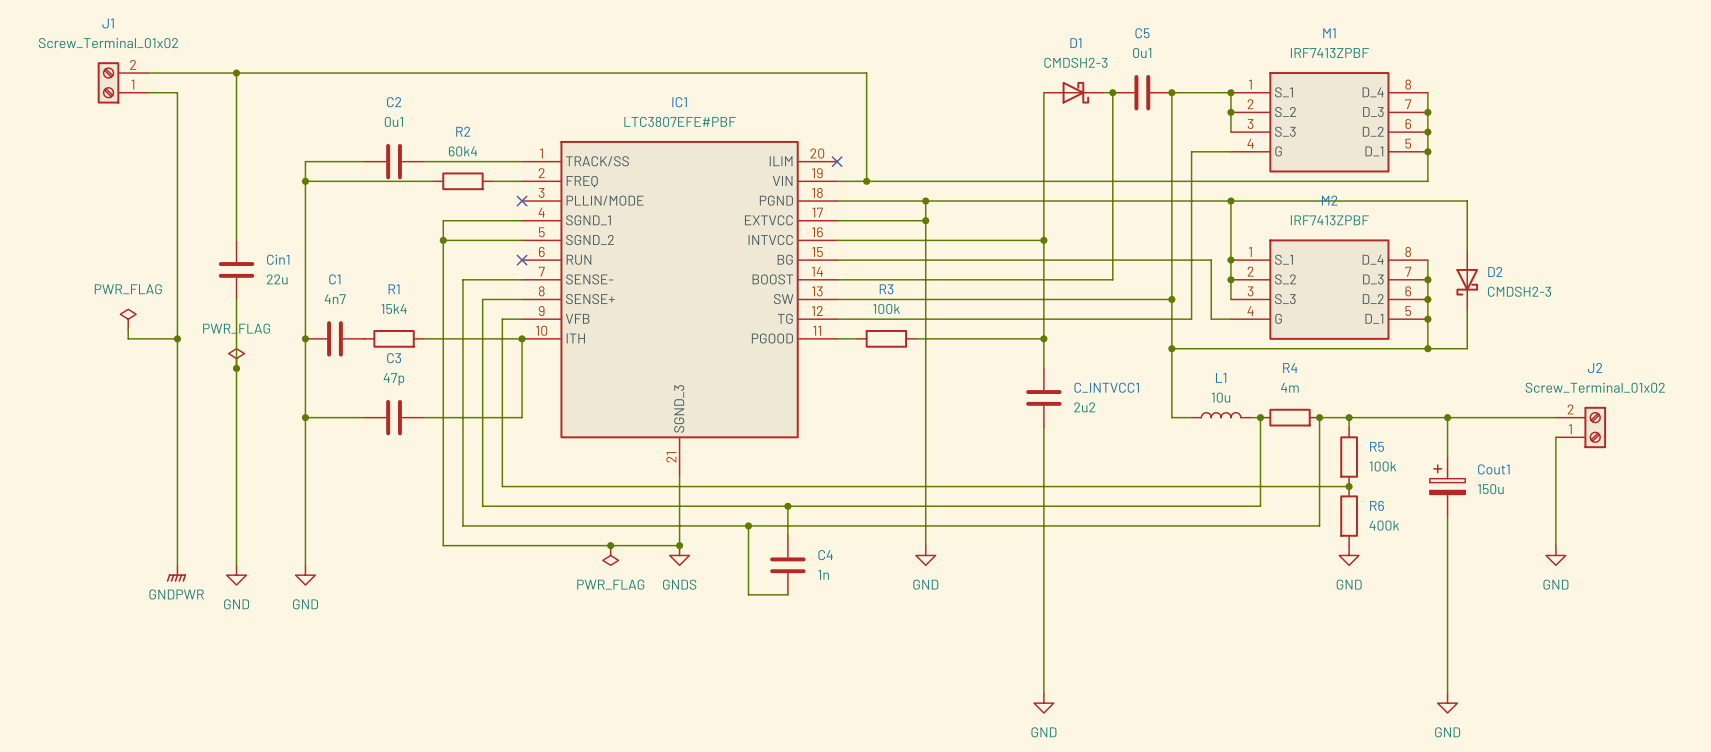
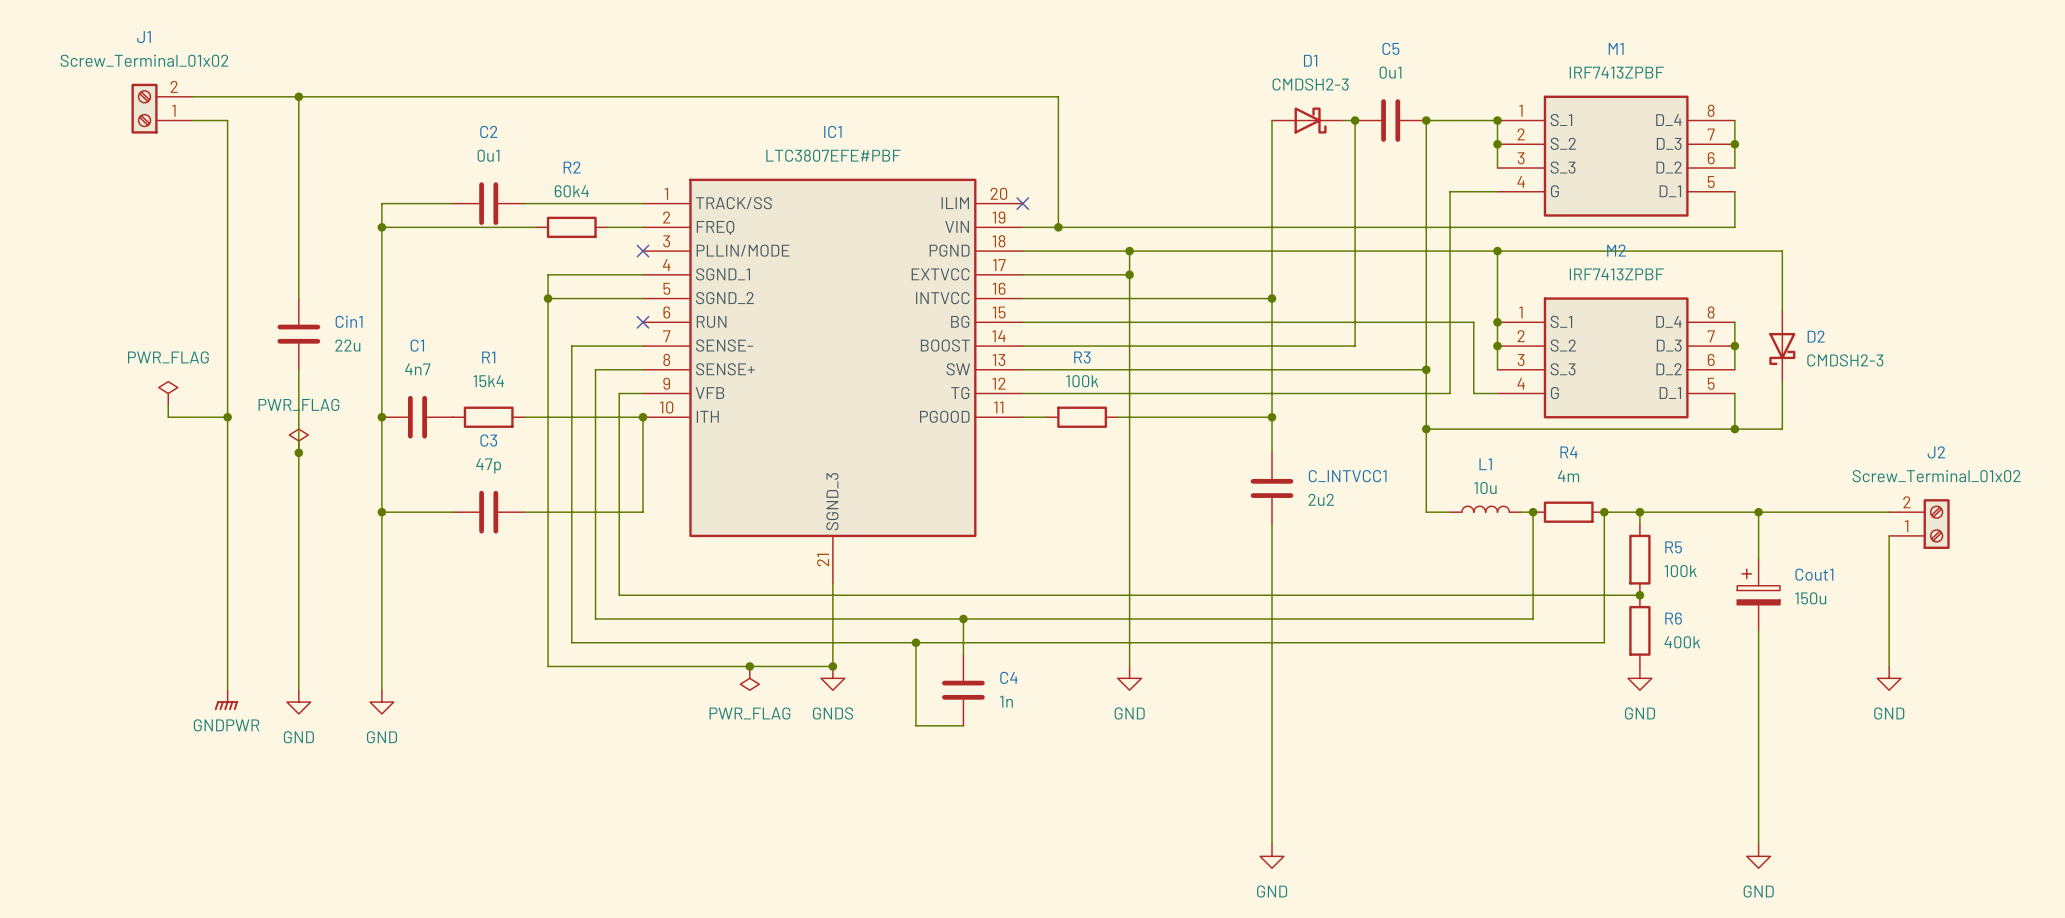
wire: (1427, 132) (1427, 151) -> none
junction: (1427, 132) -> none
junction: (1427, 151) -> none
wire: (1427, 299) (1427, 319) -> none
junction: (1427, 299) -> none
junction: (1427, 319) -> none

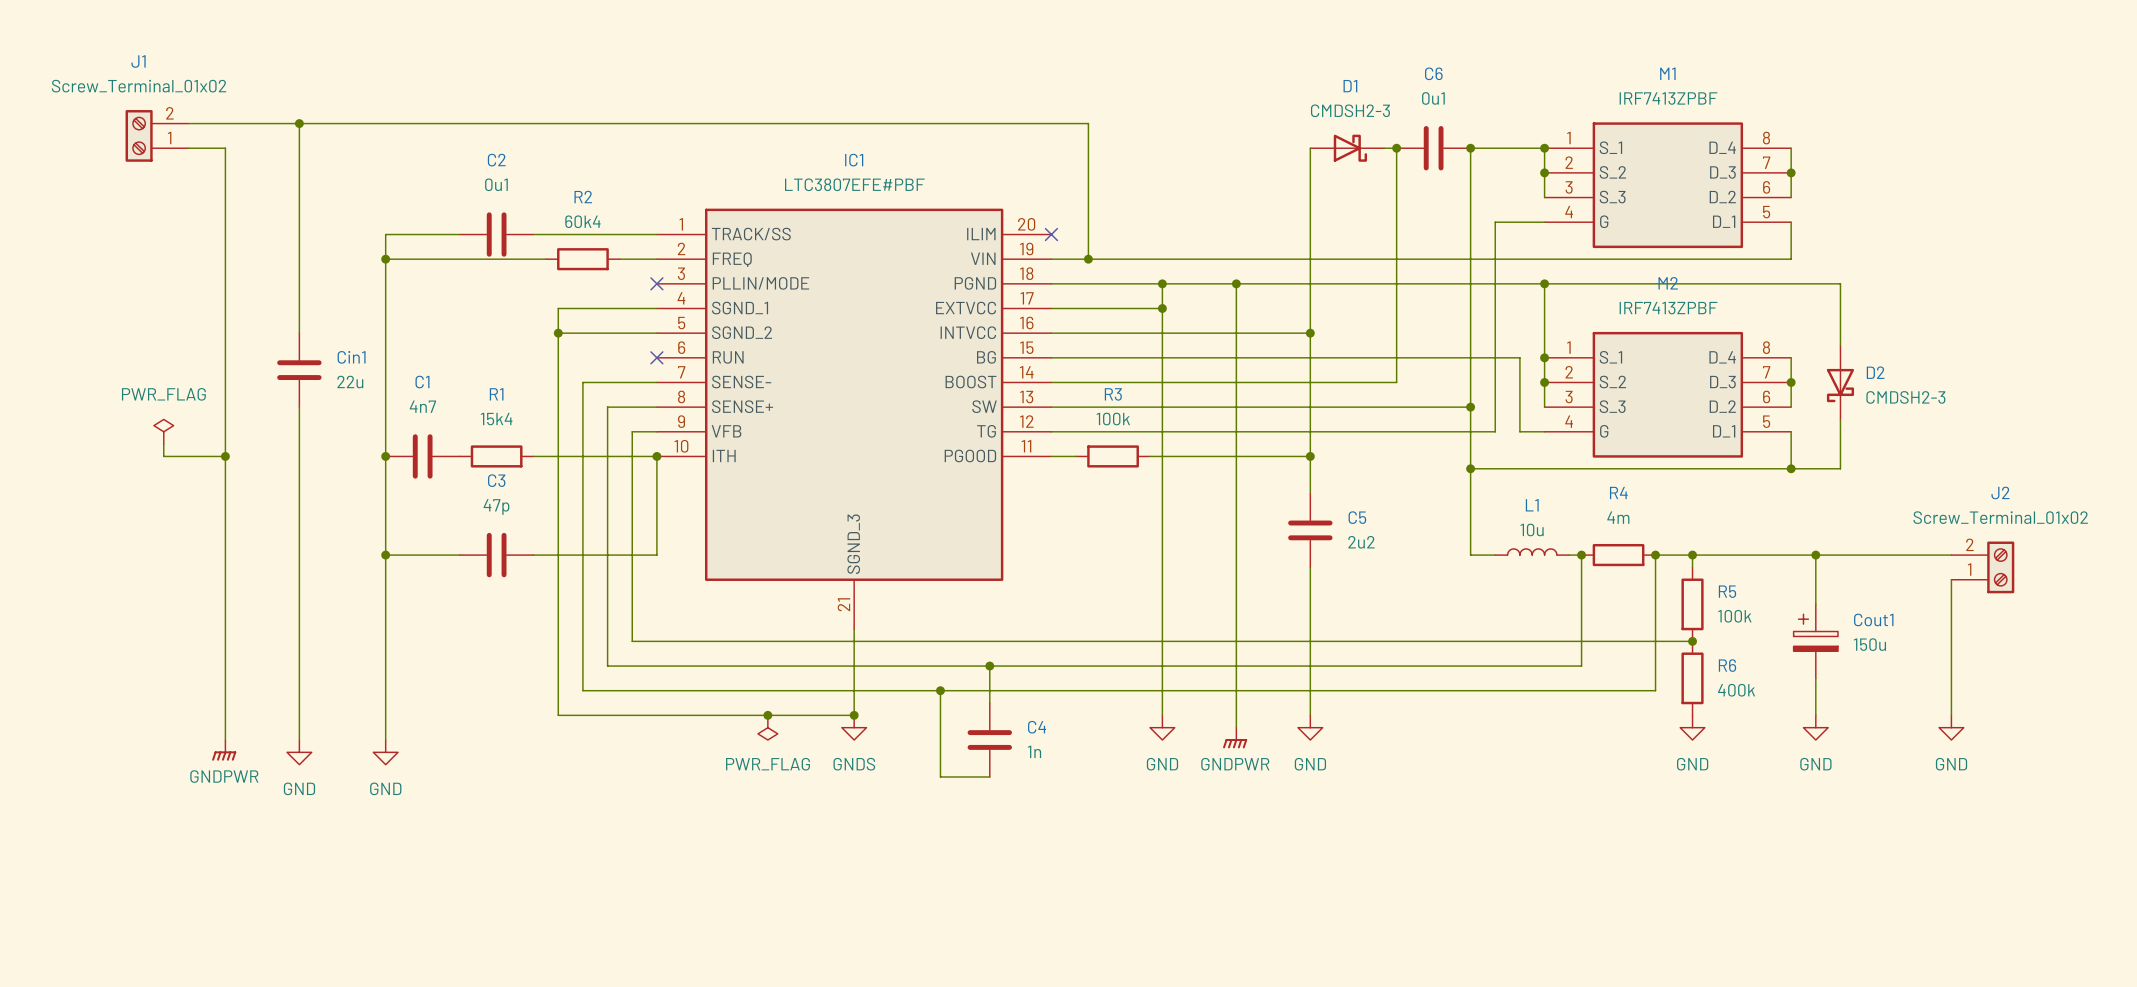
C5 name: C5 (1390, 48) -> C6 (1433, 73)
wire: none -> (1236, 283) (1236, 727)
junction: none -> (1236, 283)
power symbol: PWR_FLAG (298, 440) -> none
junction: (298, 452) -> none
C_INTVCC1 name: C_INTVCC1 (1347, 476) -> C5 (1357, 517)
wire: (1272, 666) (1272, 844) -> none
wire: (1758, 666) (1758, 844) -> none
power symbol: none -> GNDPWR (1235, 738)
power symbol position: GND (1272, 856) -> GND (1310, 727)
power symbol position: GND (1758, 856) -> GND (1815, 727)

